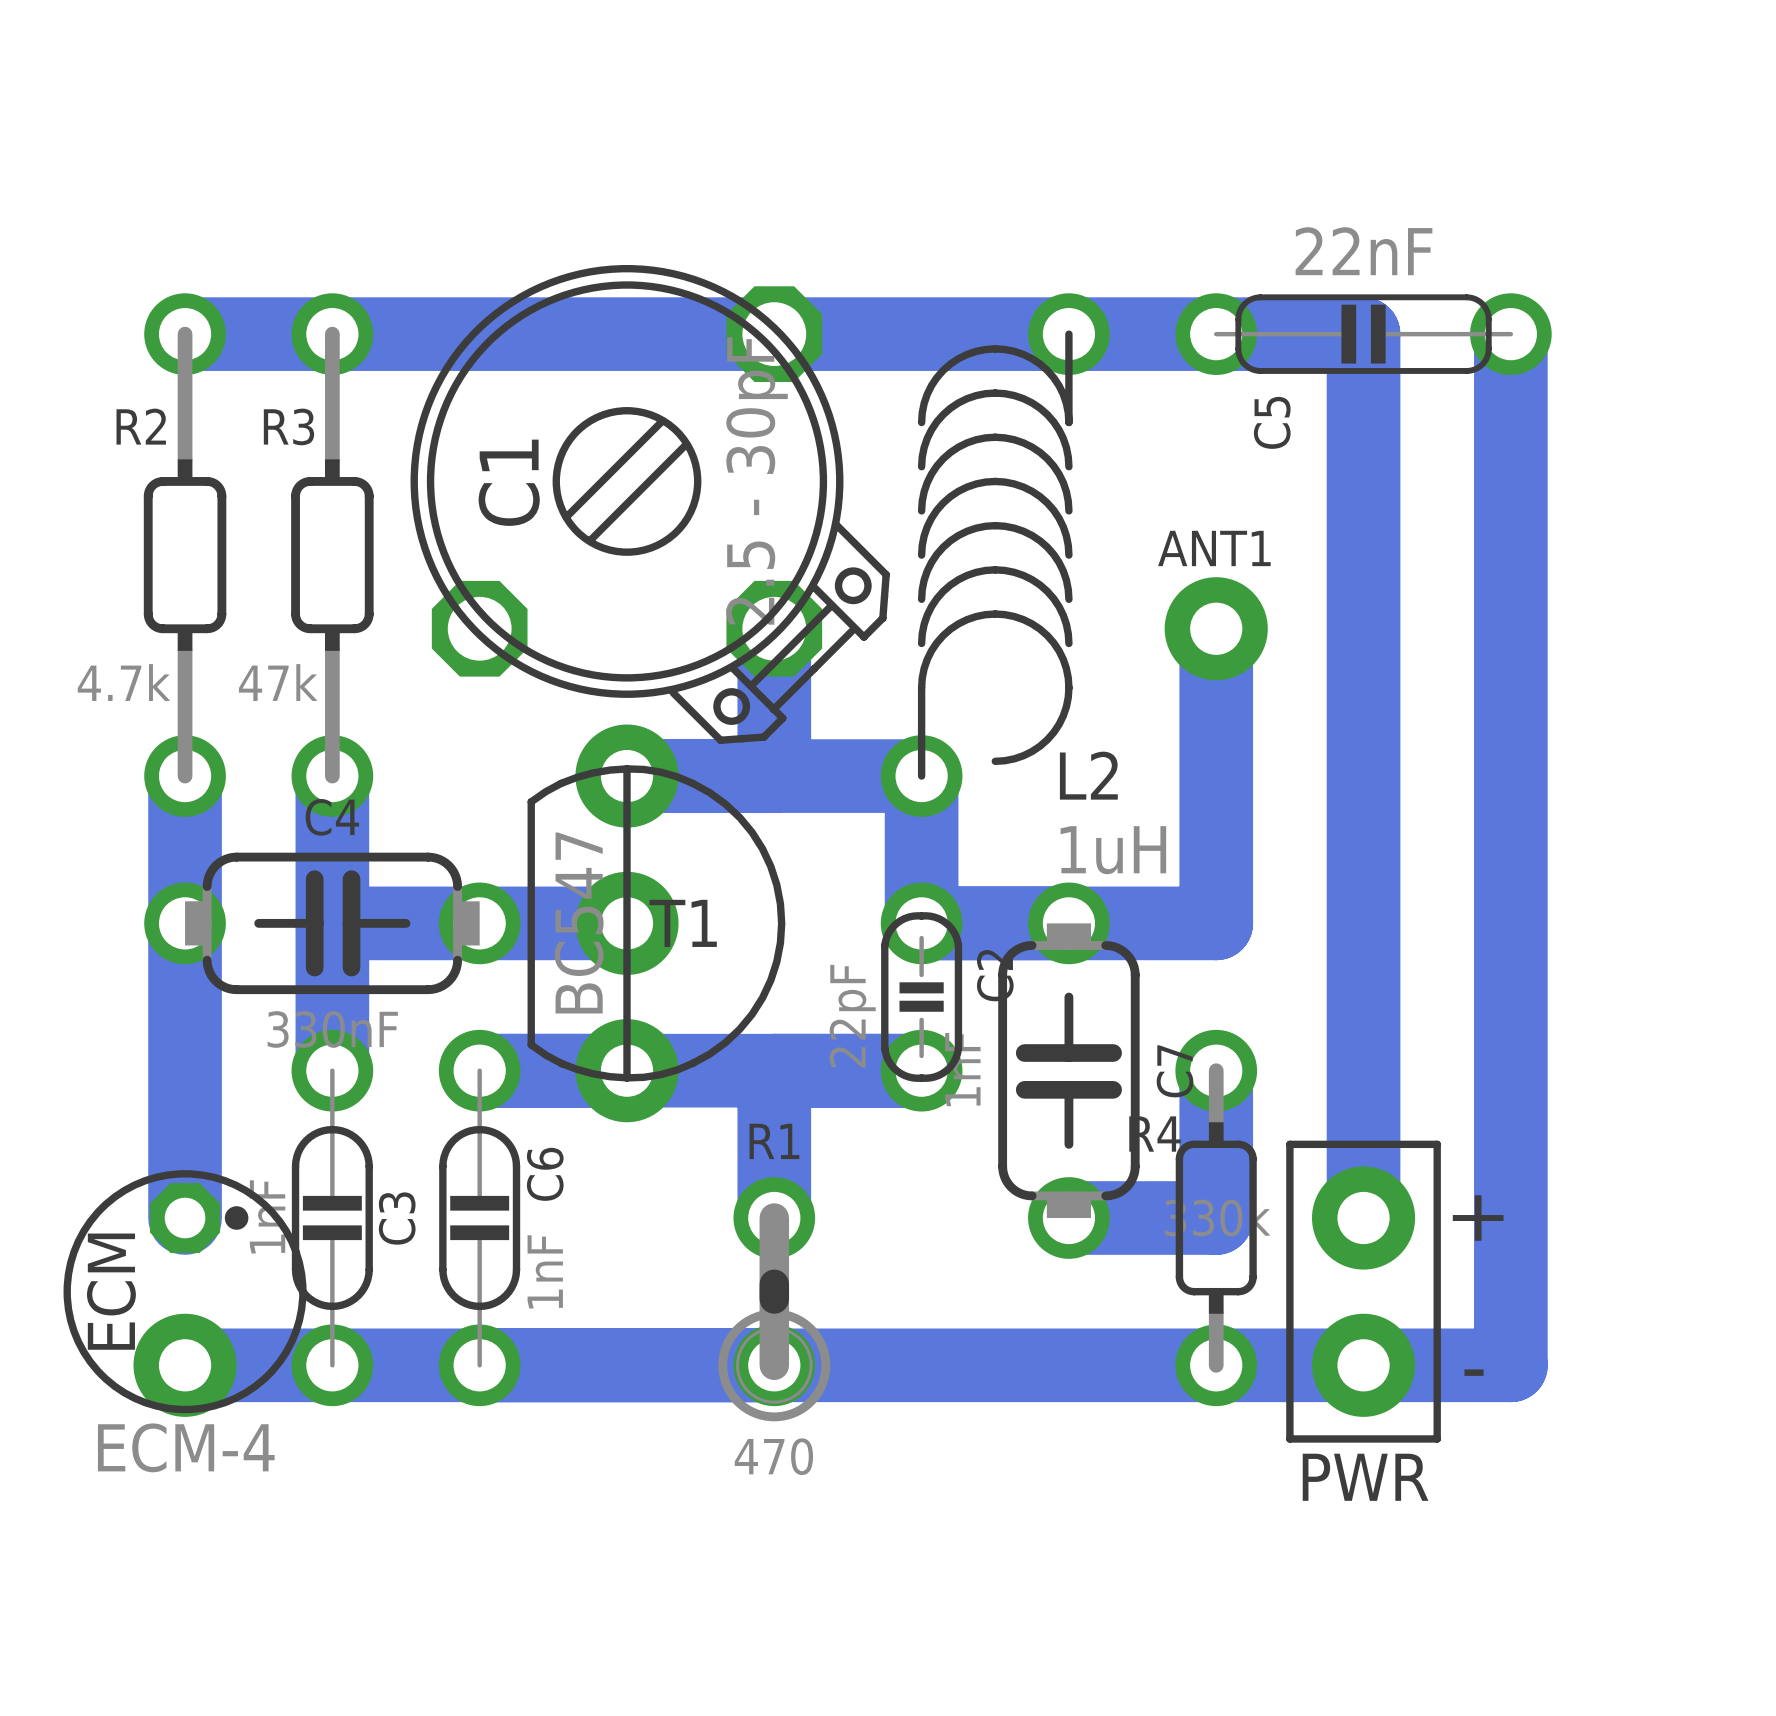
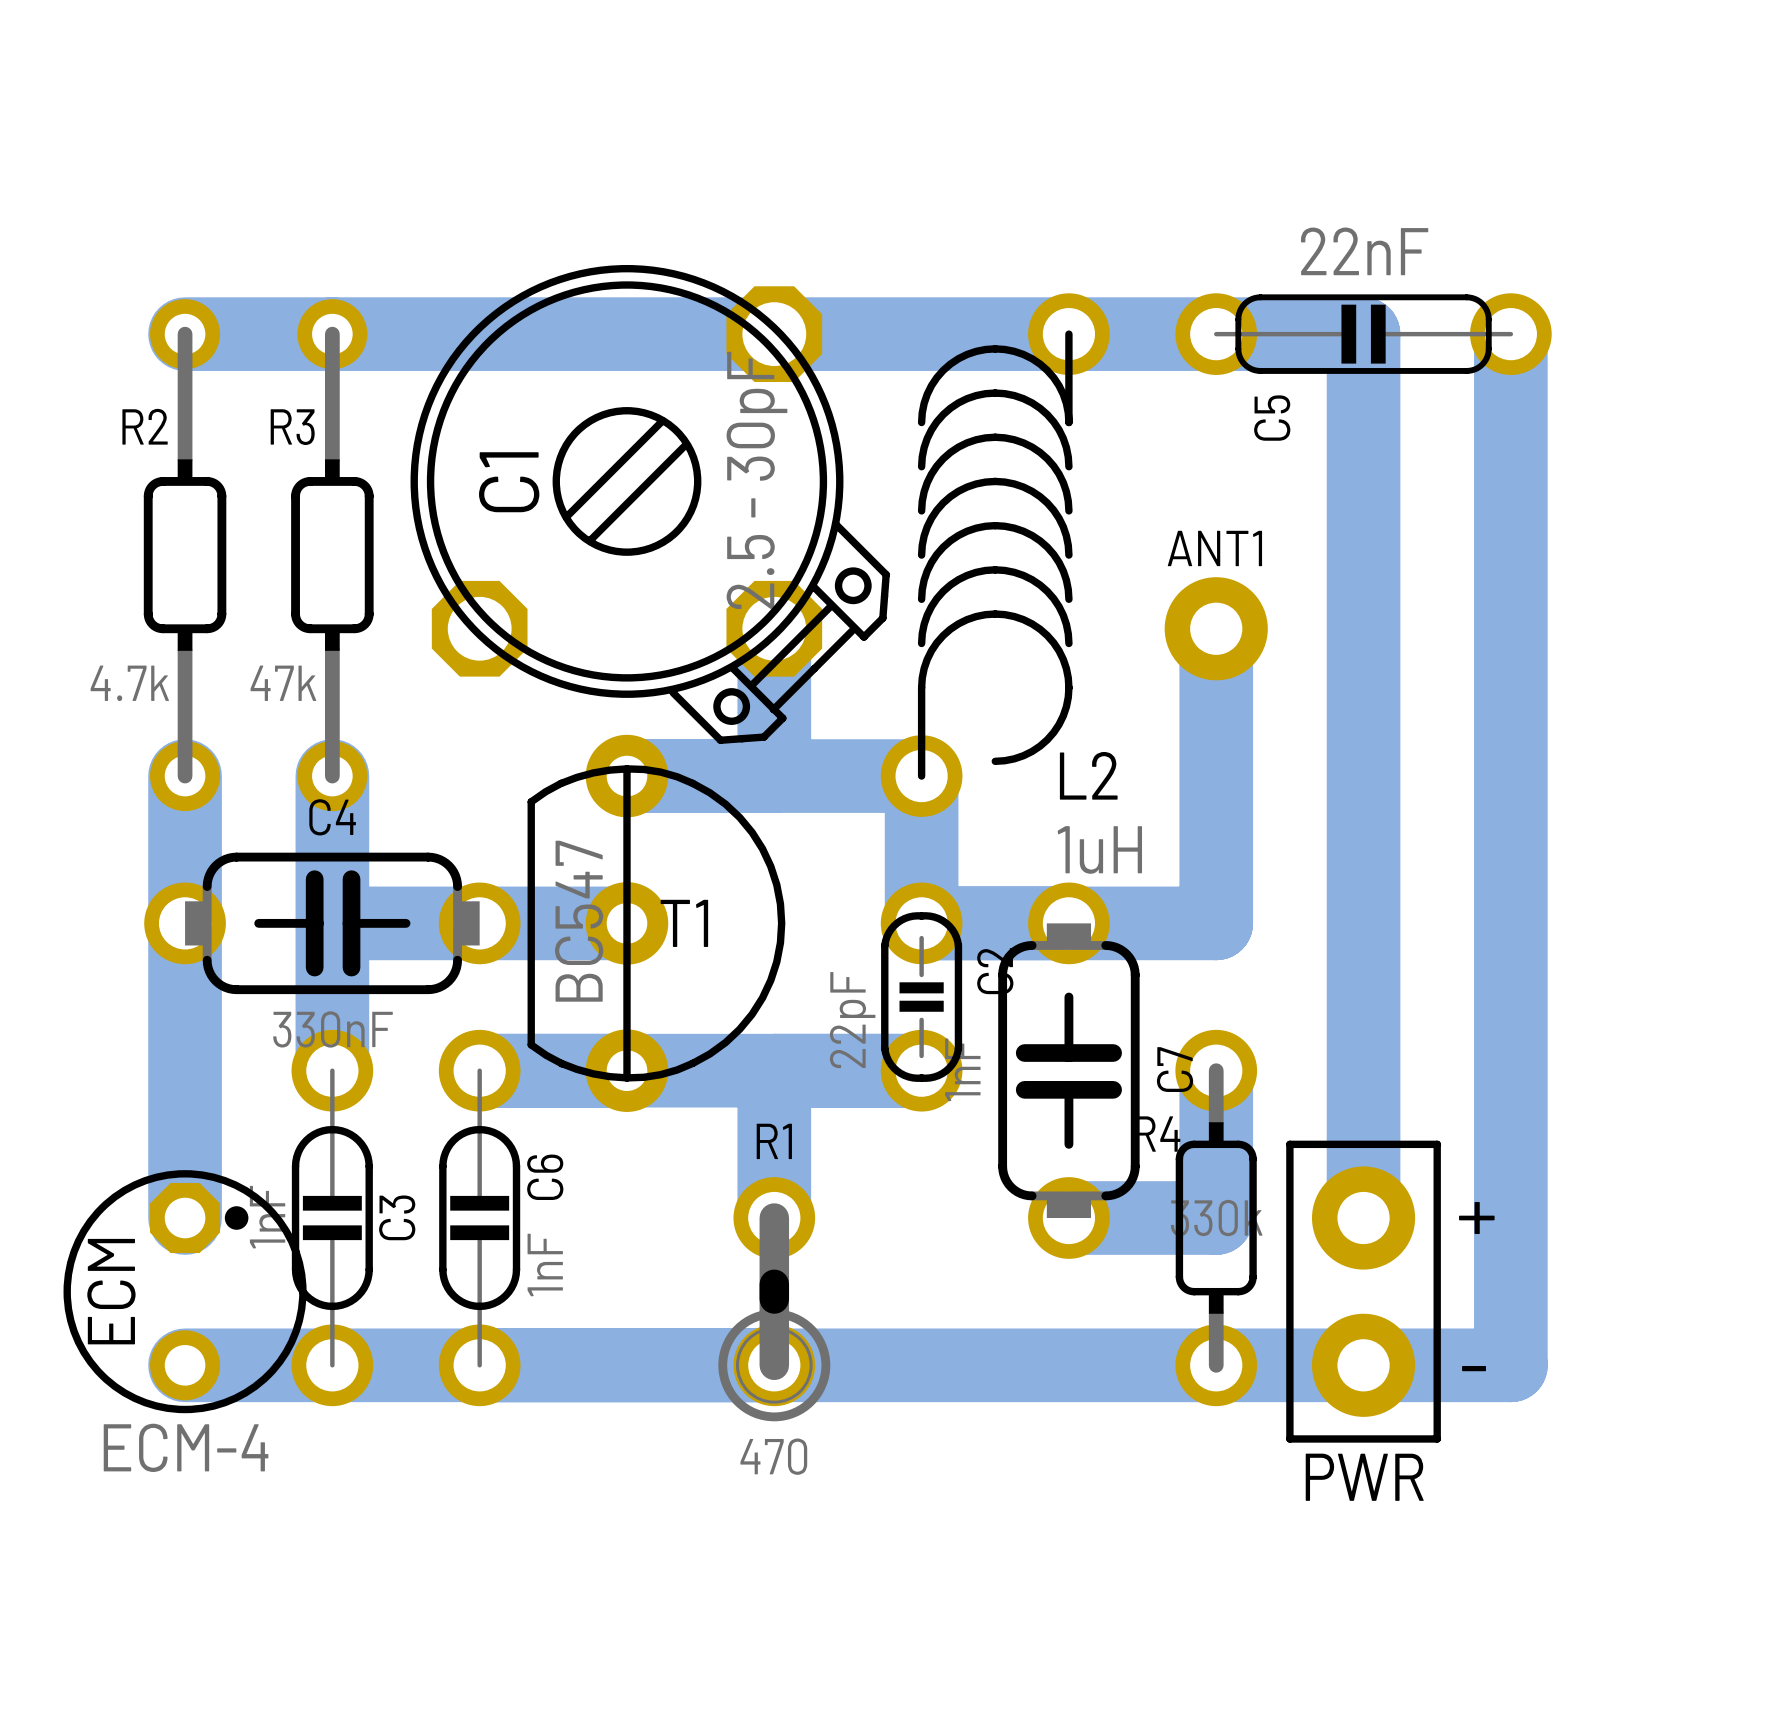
R2 footprint: [143, 293, 227, 817] -> [143, 299, 227, 812]
R3 footprint: [291, 293, 374, 817] -> [291, 299, 374, 812]
T1 footprint: [527, 724, 786, 1123] -> [527, 734, 786, 1112]
ECM footprint: [63, 1170, 307, 1417] -> [63, 1170, 307, 1414]

